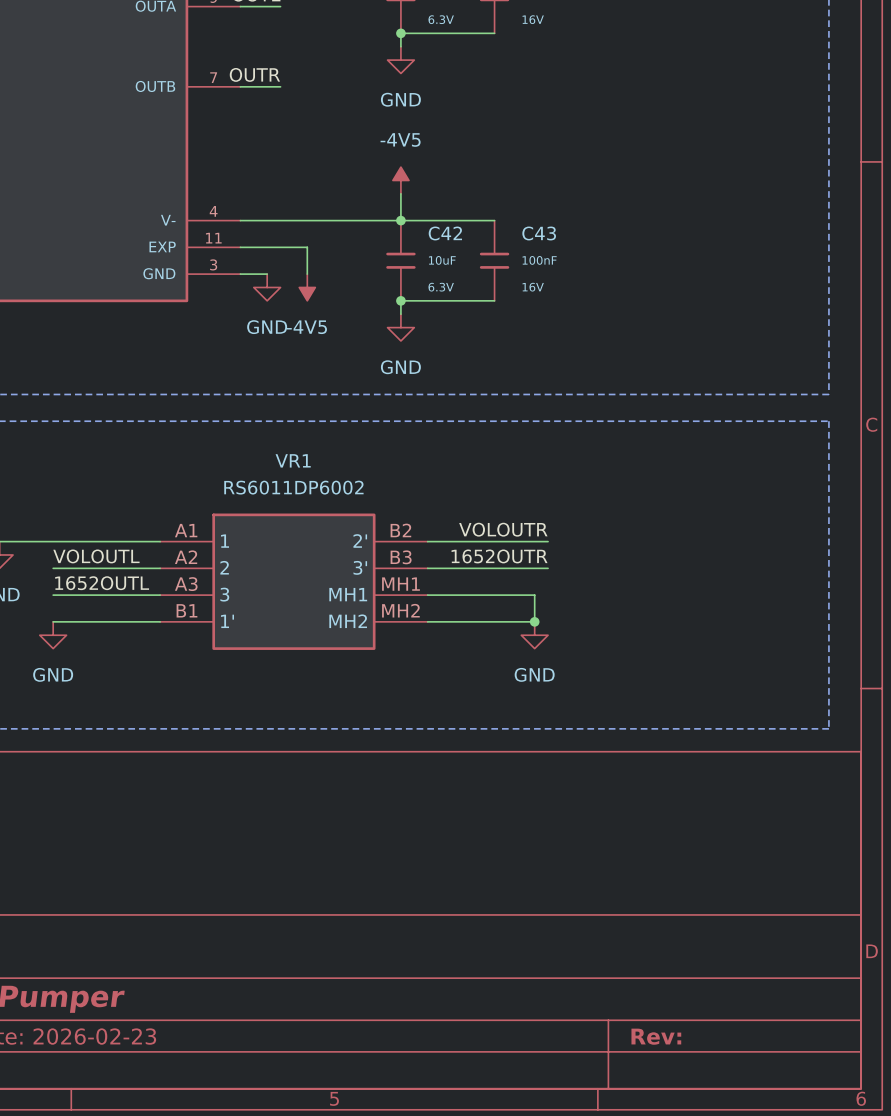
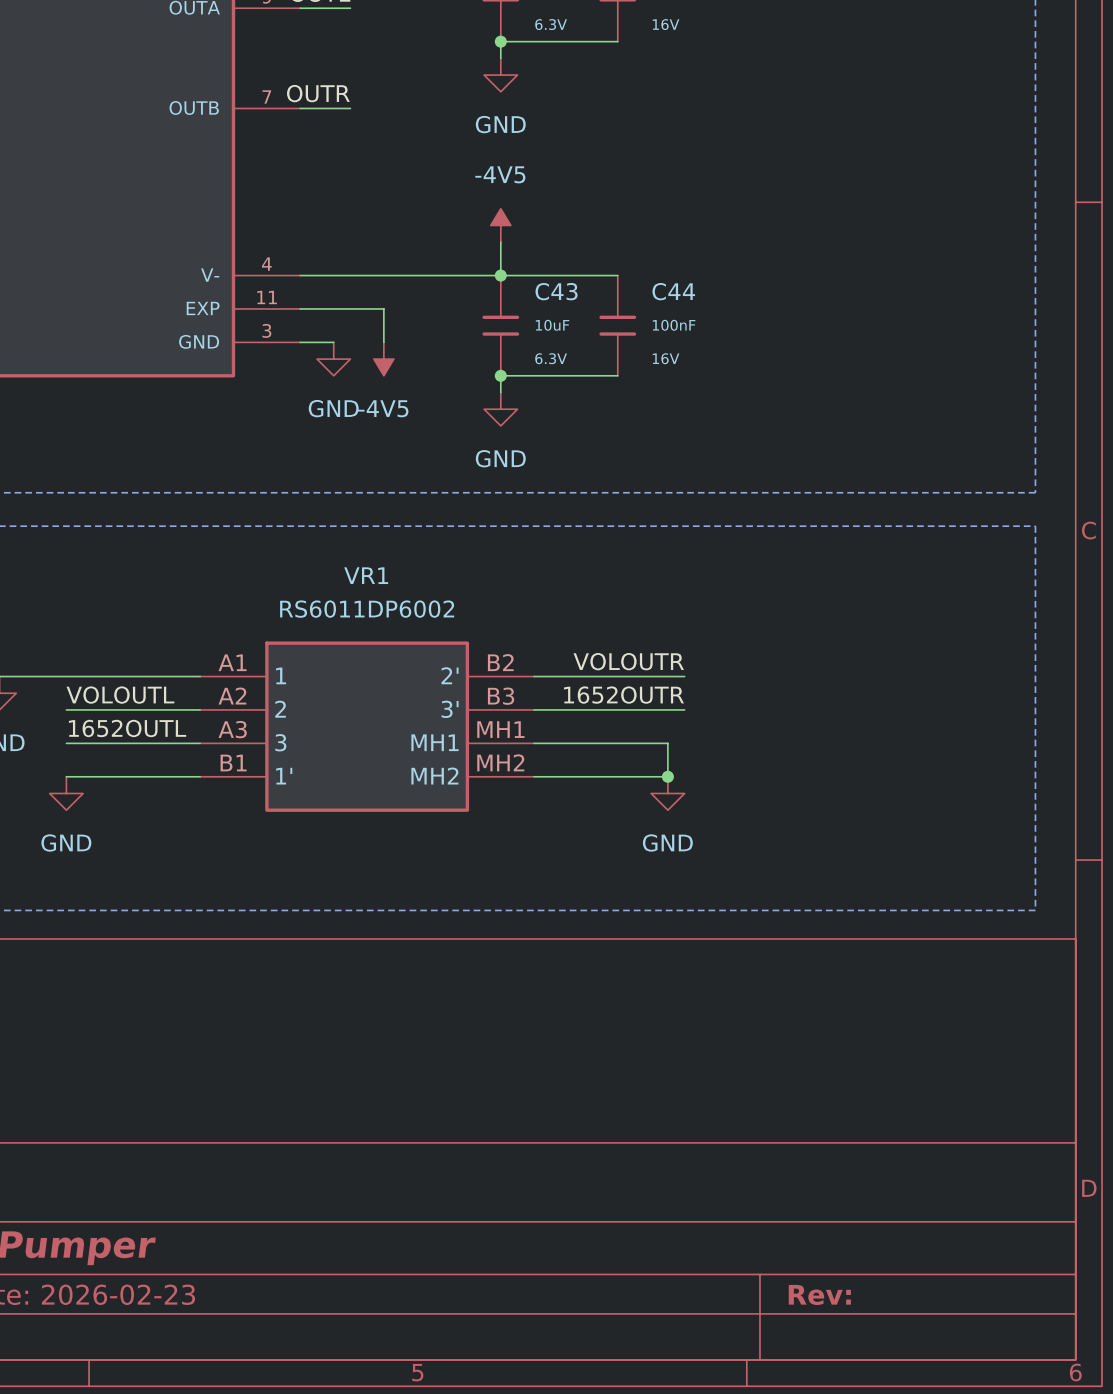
C42 name: C42 (445, 233) -> C43 (556, 291)
C43 name: C43 (539, 233) -> C44 (673, 291)

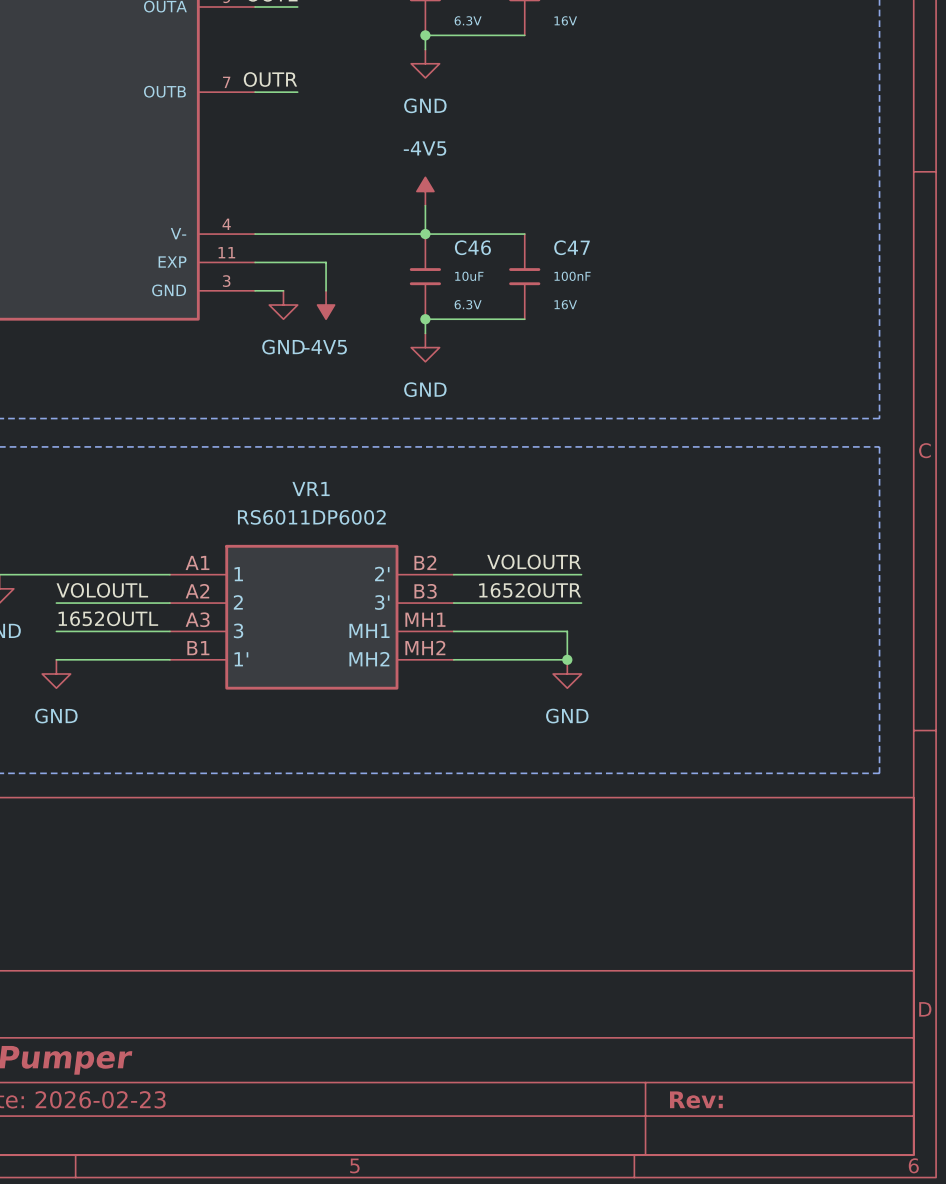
C43 name: C43 (556, 291) -> C46 (472, 247)
C44 name: C44 (673, 291) -> C47 (572, 247)

